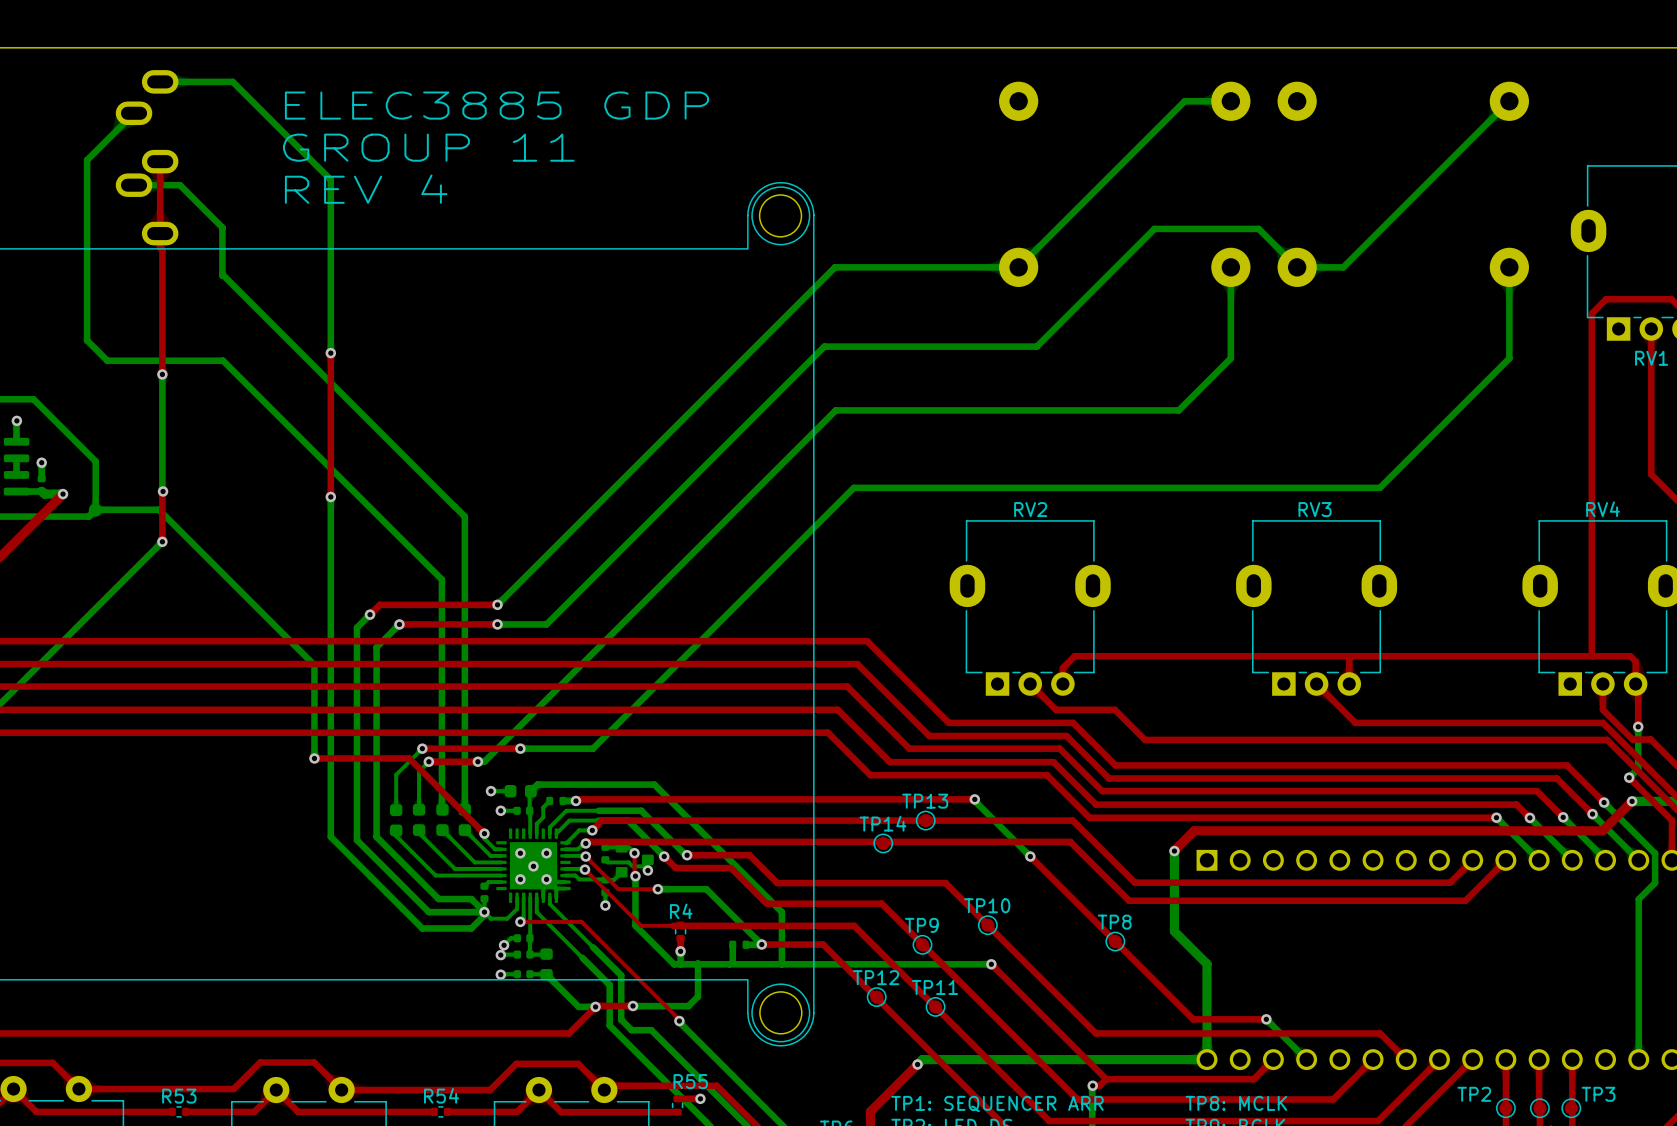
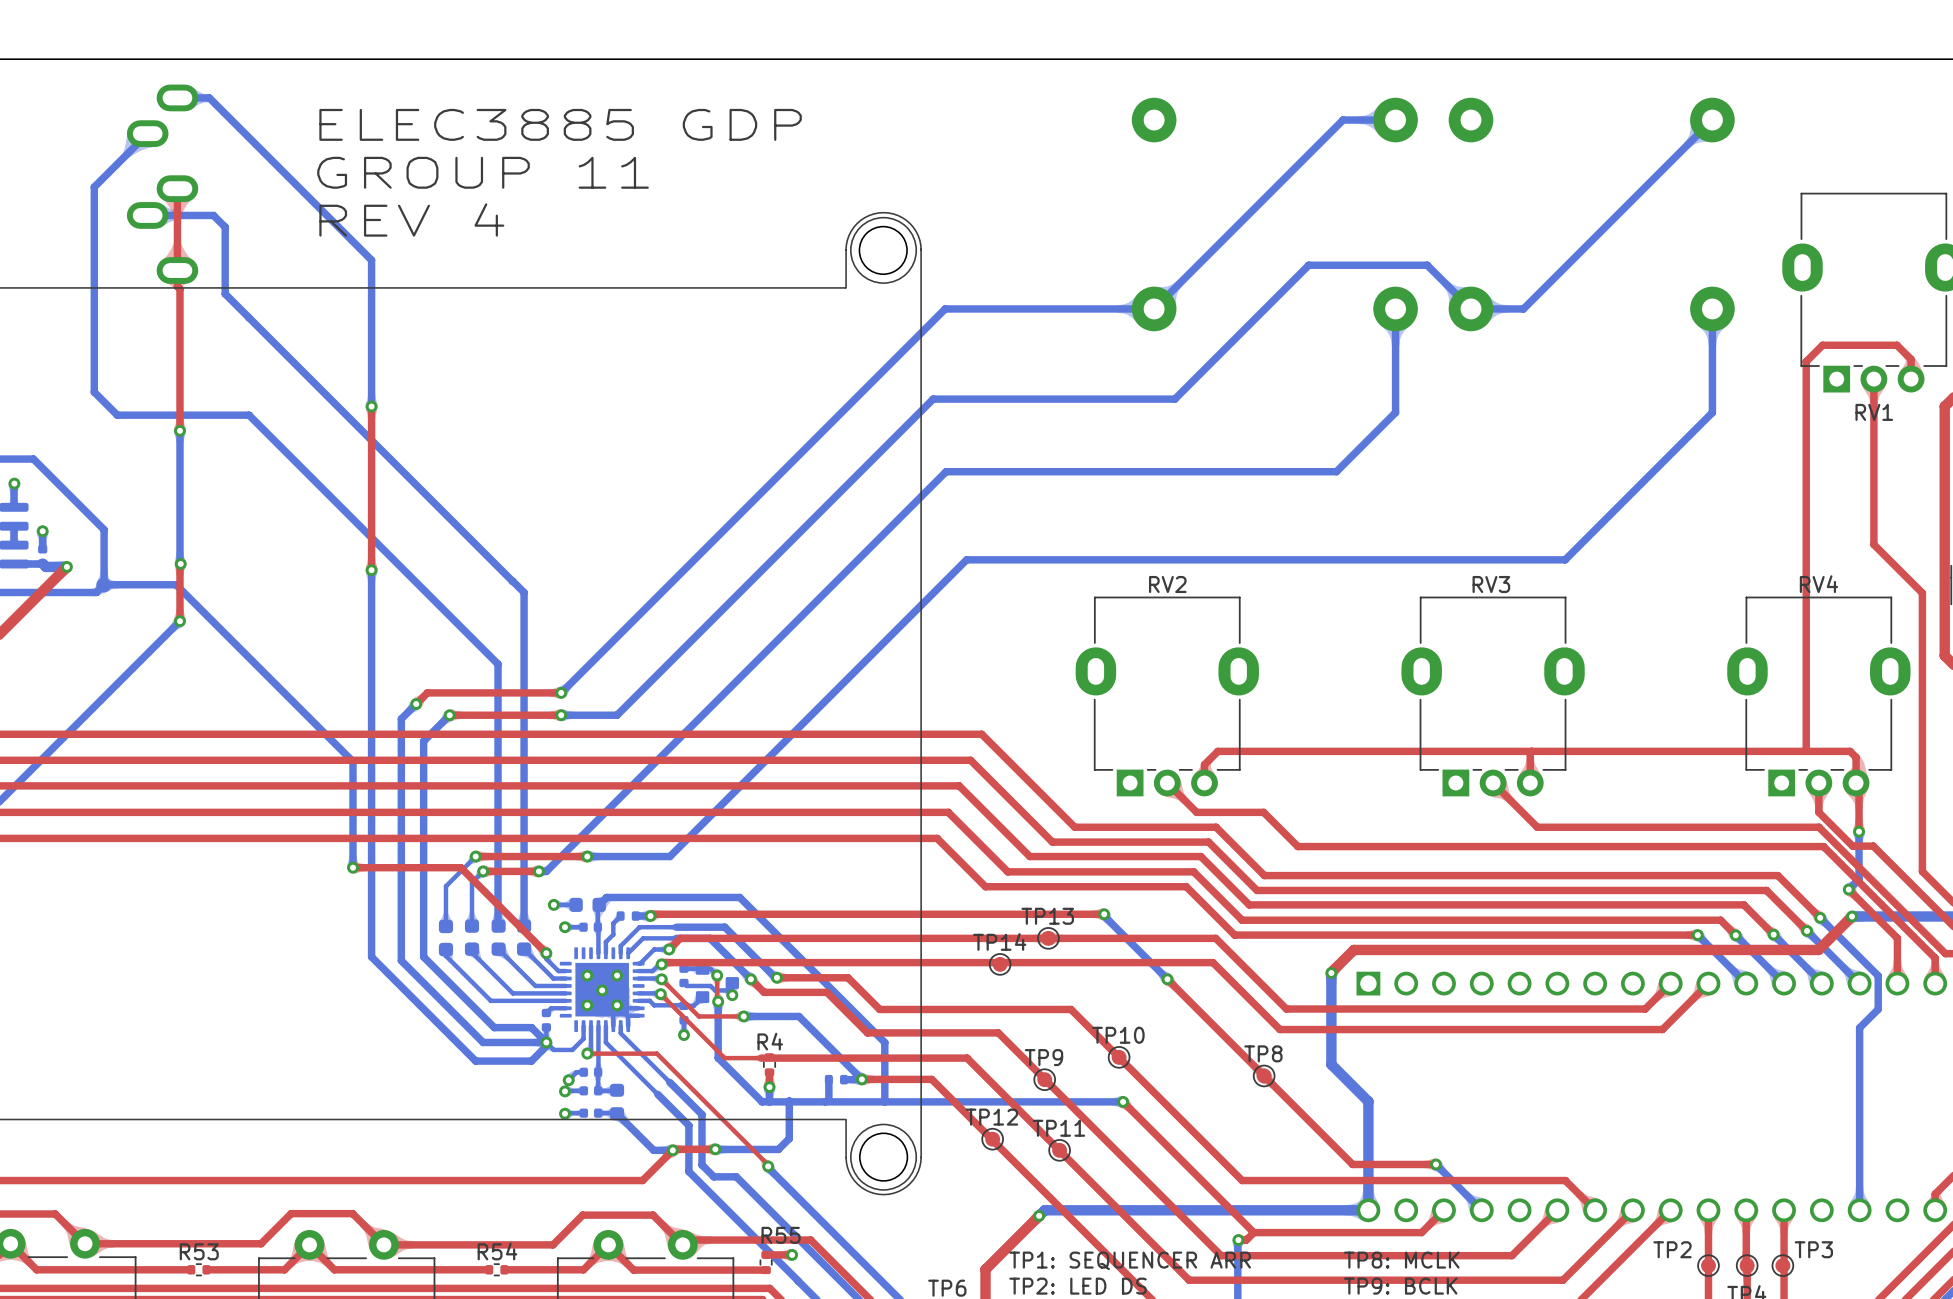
bottom track: (188, 81) (232, 81) (330, 179) (330, 224) -> (209, 97) (371, 260)
bottom track: (180, 185) (222, 227) -> (200, 215) (213, 215) (225, 227) (225, 293) (249, 317)
bottom track: (222, 227) (223, 275) -> none

